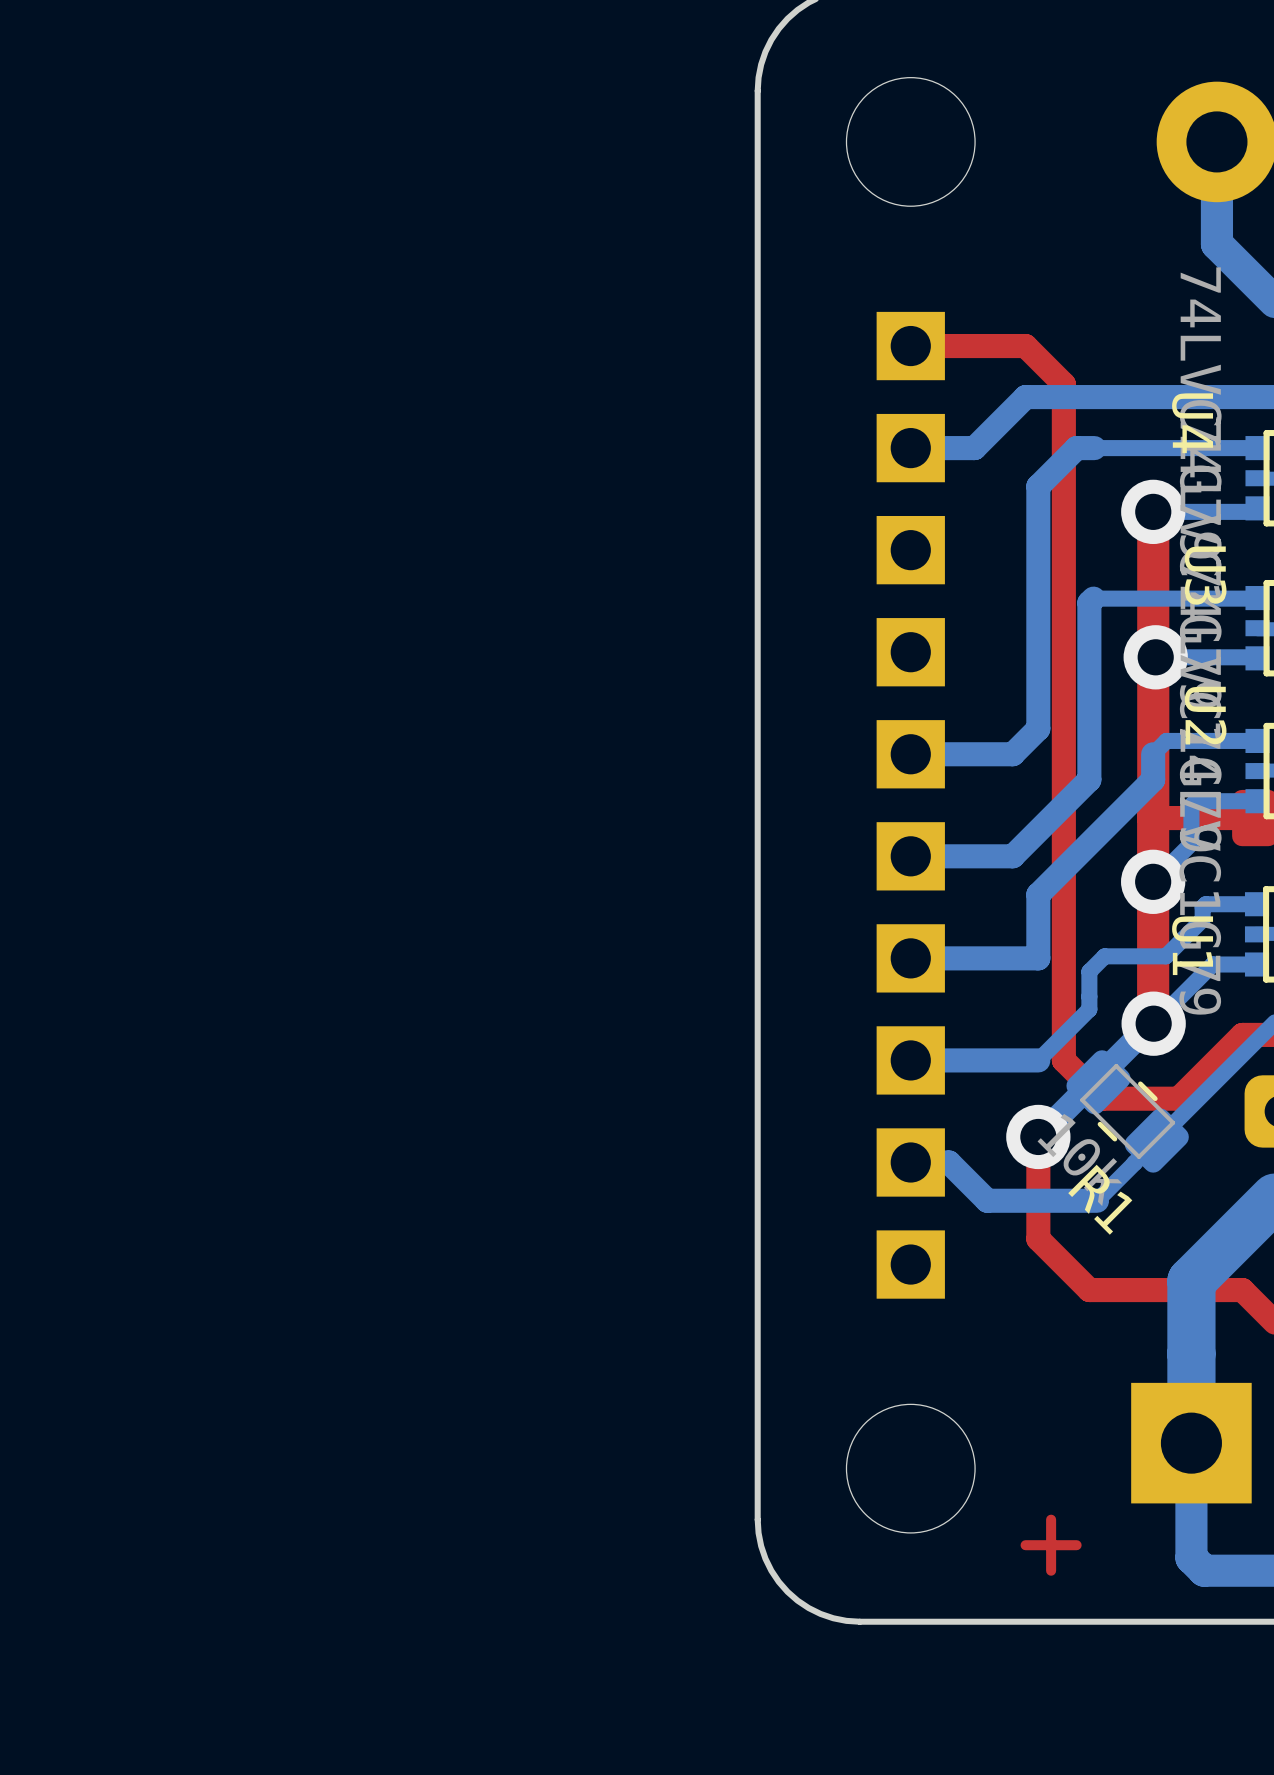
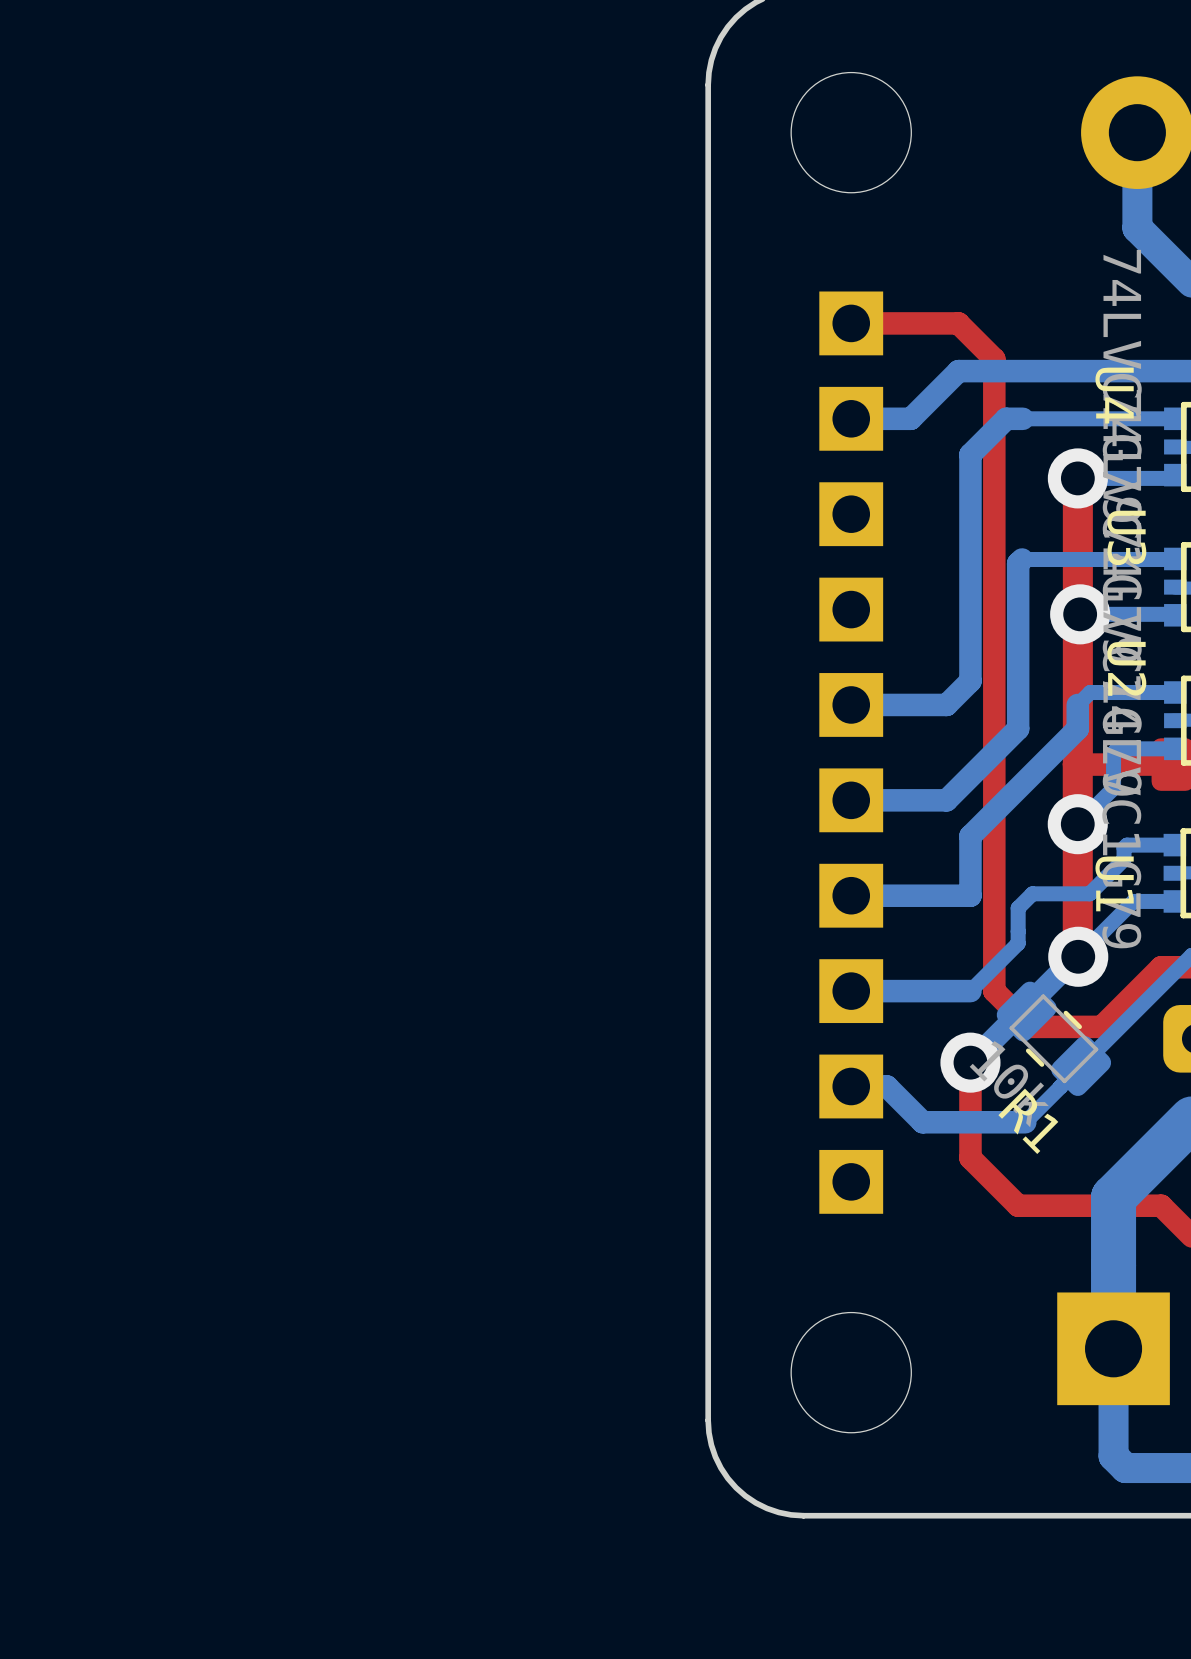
top track: (1051, 1519) (1051, 1570) -> none
top track: (1076, 1545) (1025, 1545) -> none

